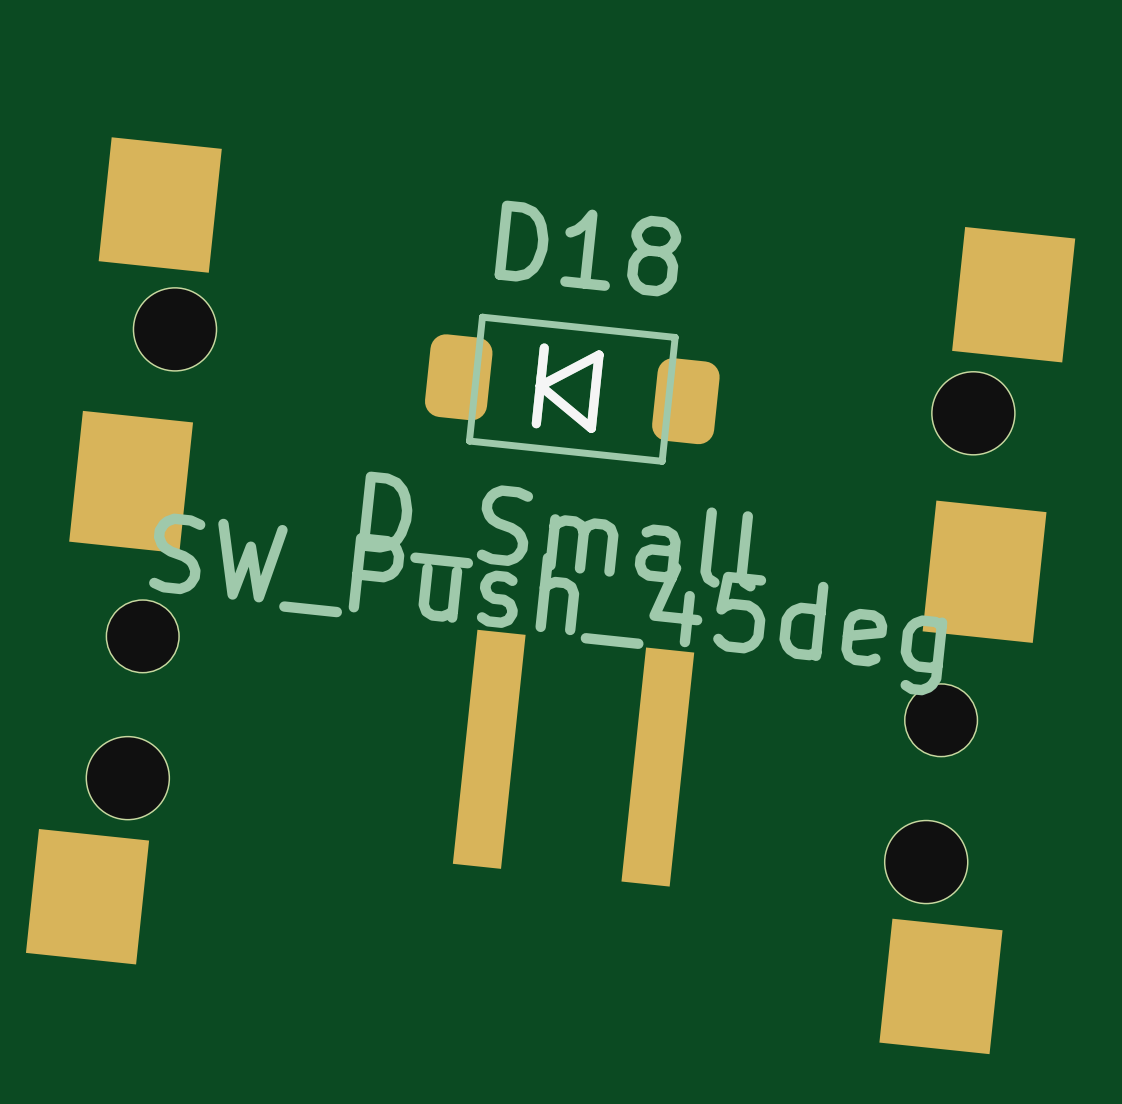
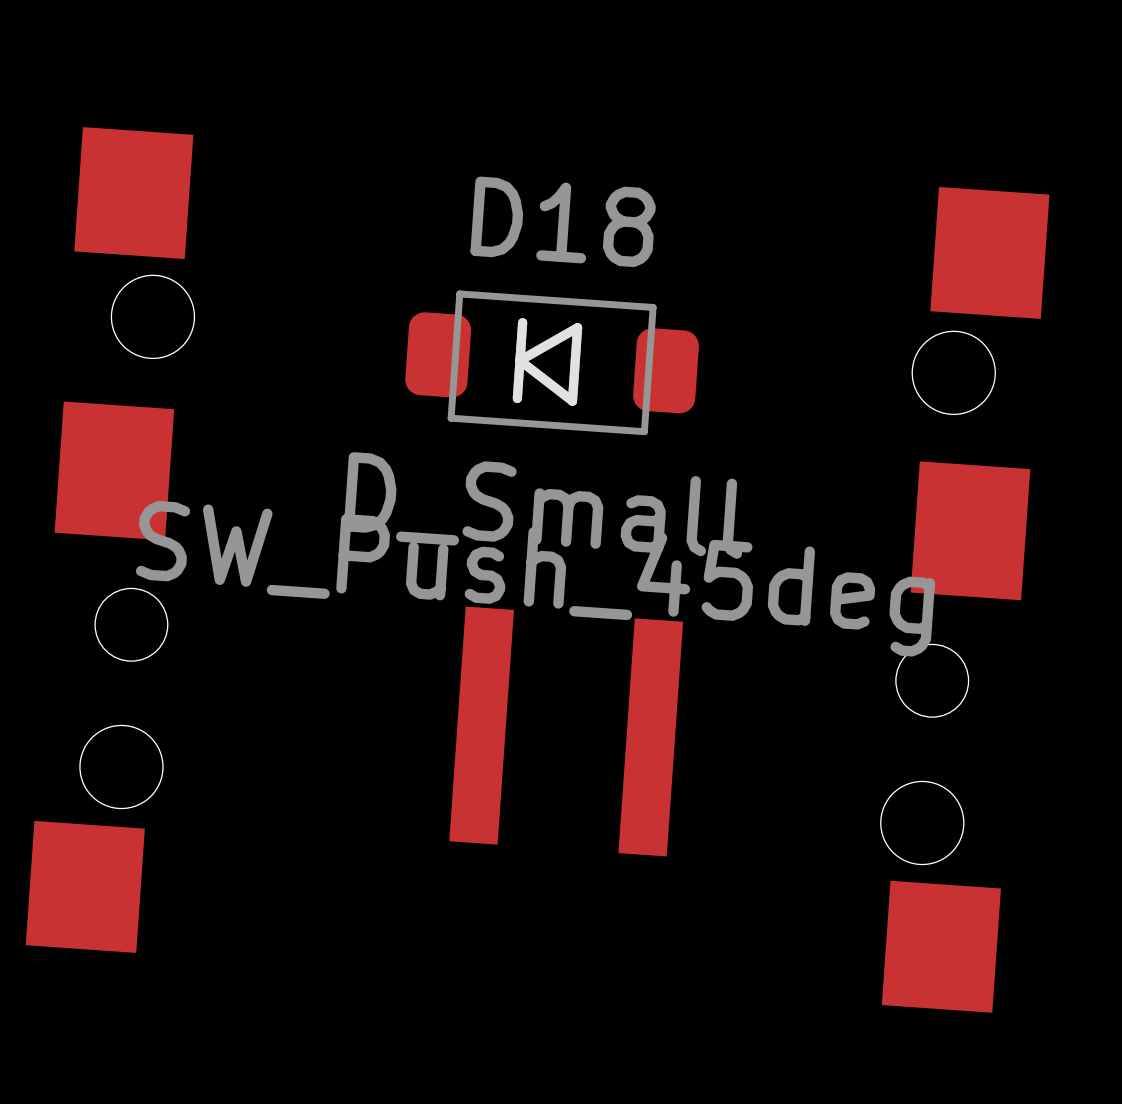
D18 rotation: 0° (572, 389) -> 2° counterclockwise (552, 362)
part rotation: 0° (550, 595) -> 2° counterclockwise (537, 569)

